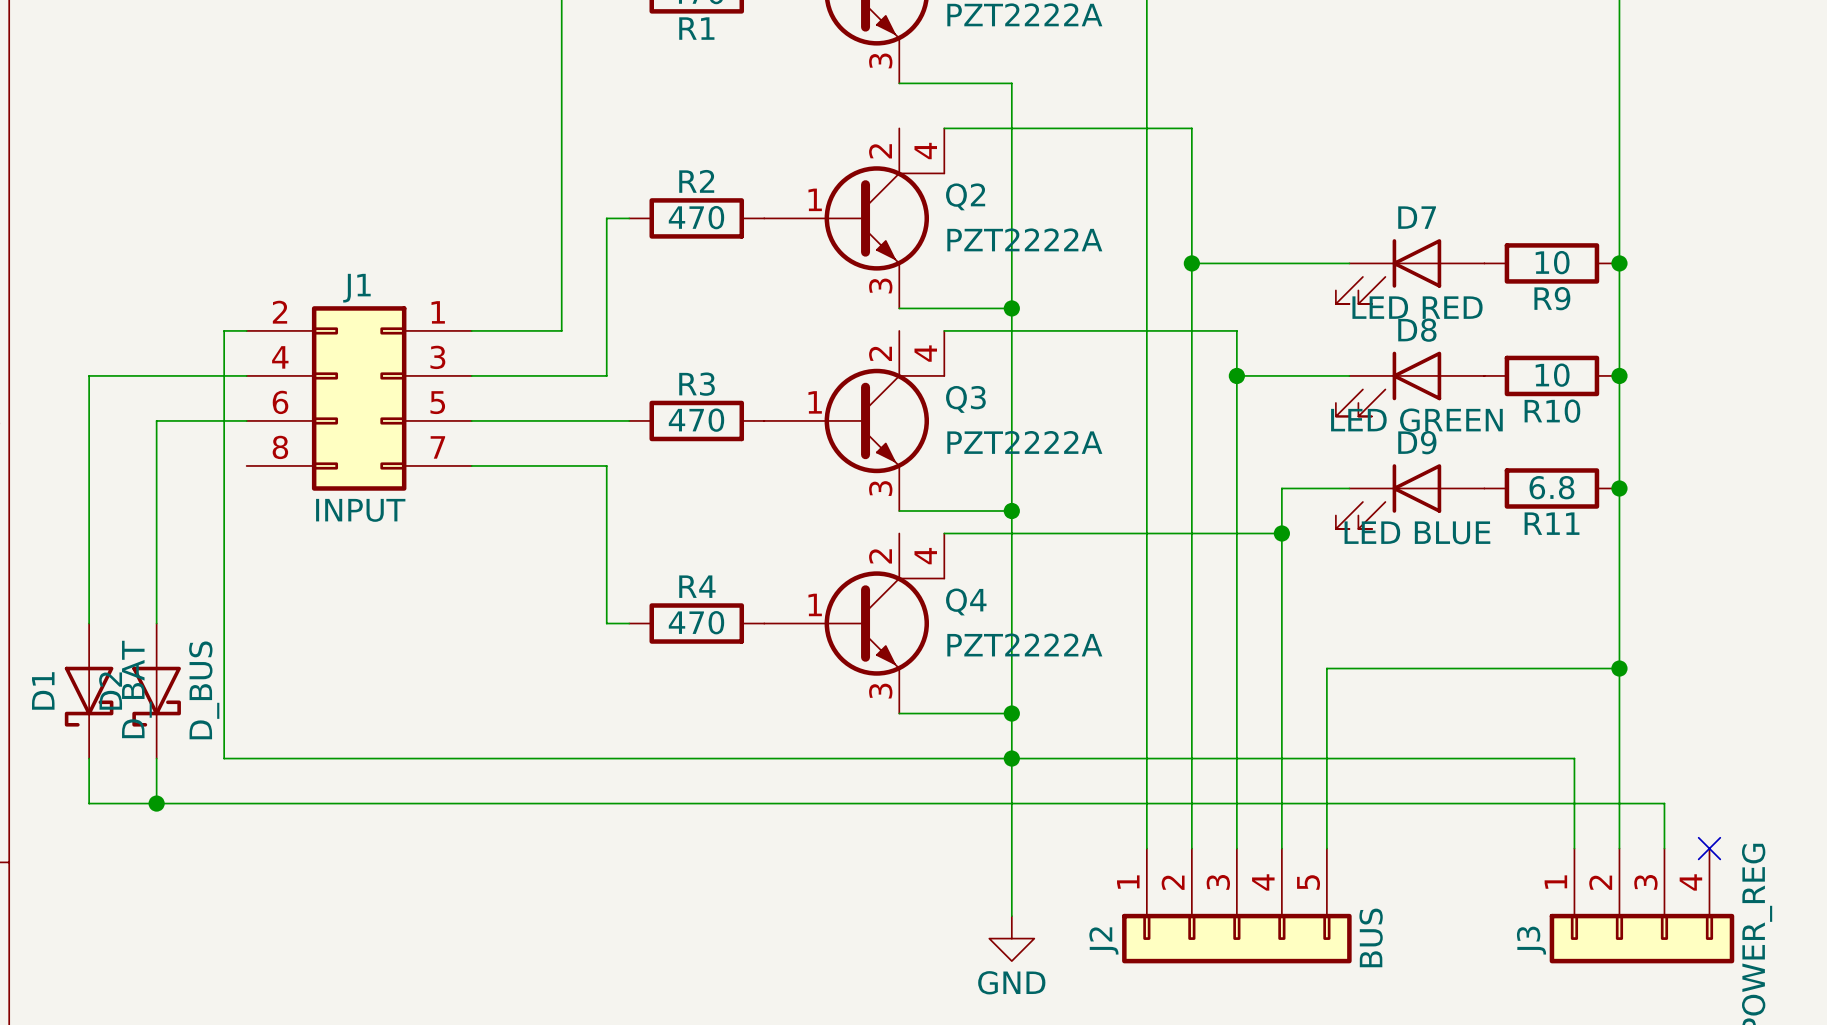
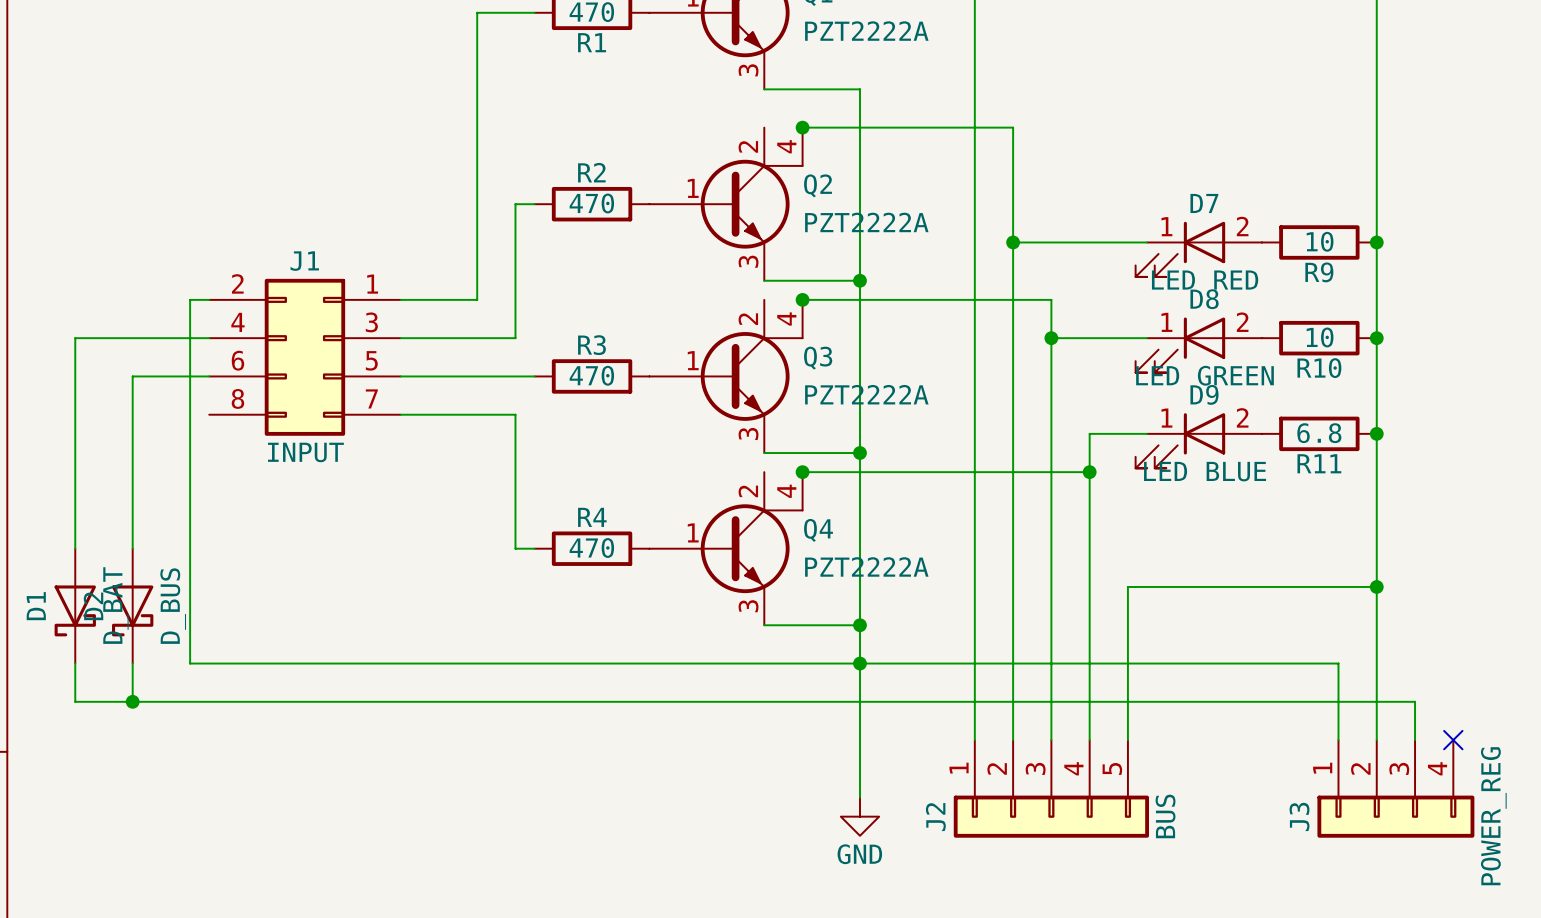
junction: none -> (802, 127)
D7 pin number: none -> 1 (1166, 226)
D7 pin number: none -> 2 (1242, 226)
junction: none -> (802, 299)
D8 pin number: none -> 1 (1166, 322)
D8 pin number: none -> 2 (1242, 322)
D9 pin number: none -> 1 (1166, 418)
D9 pin number: none -> 2 (1242, 417)
junction: none -> (802, 472)

